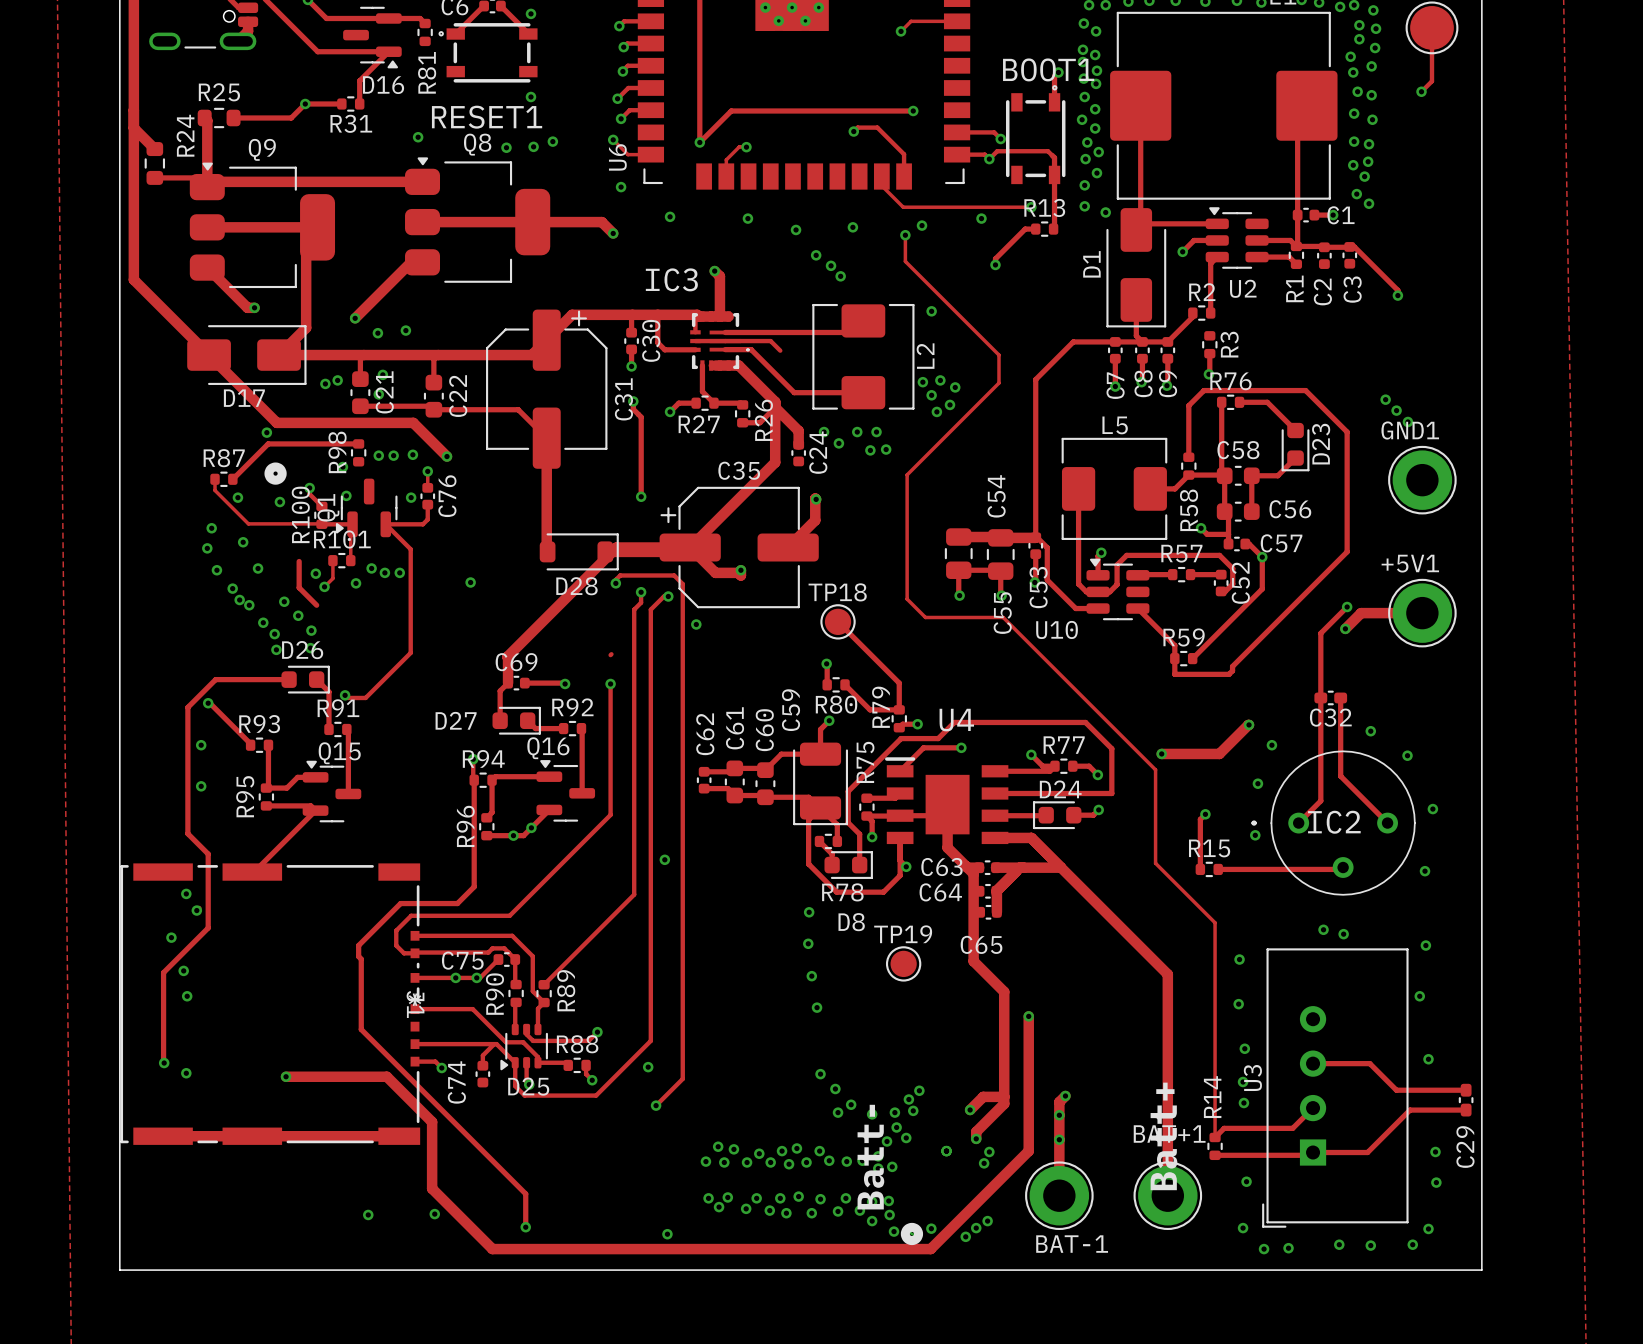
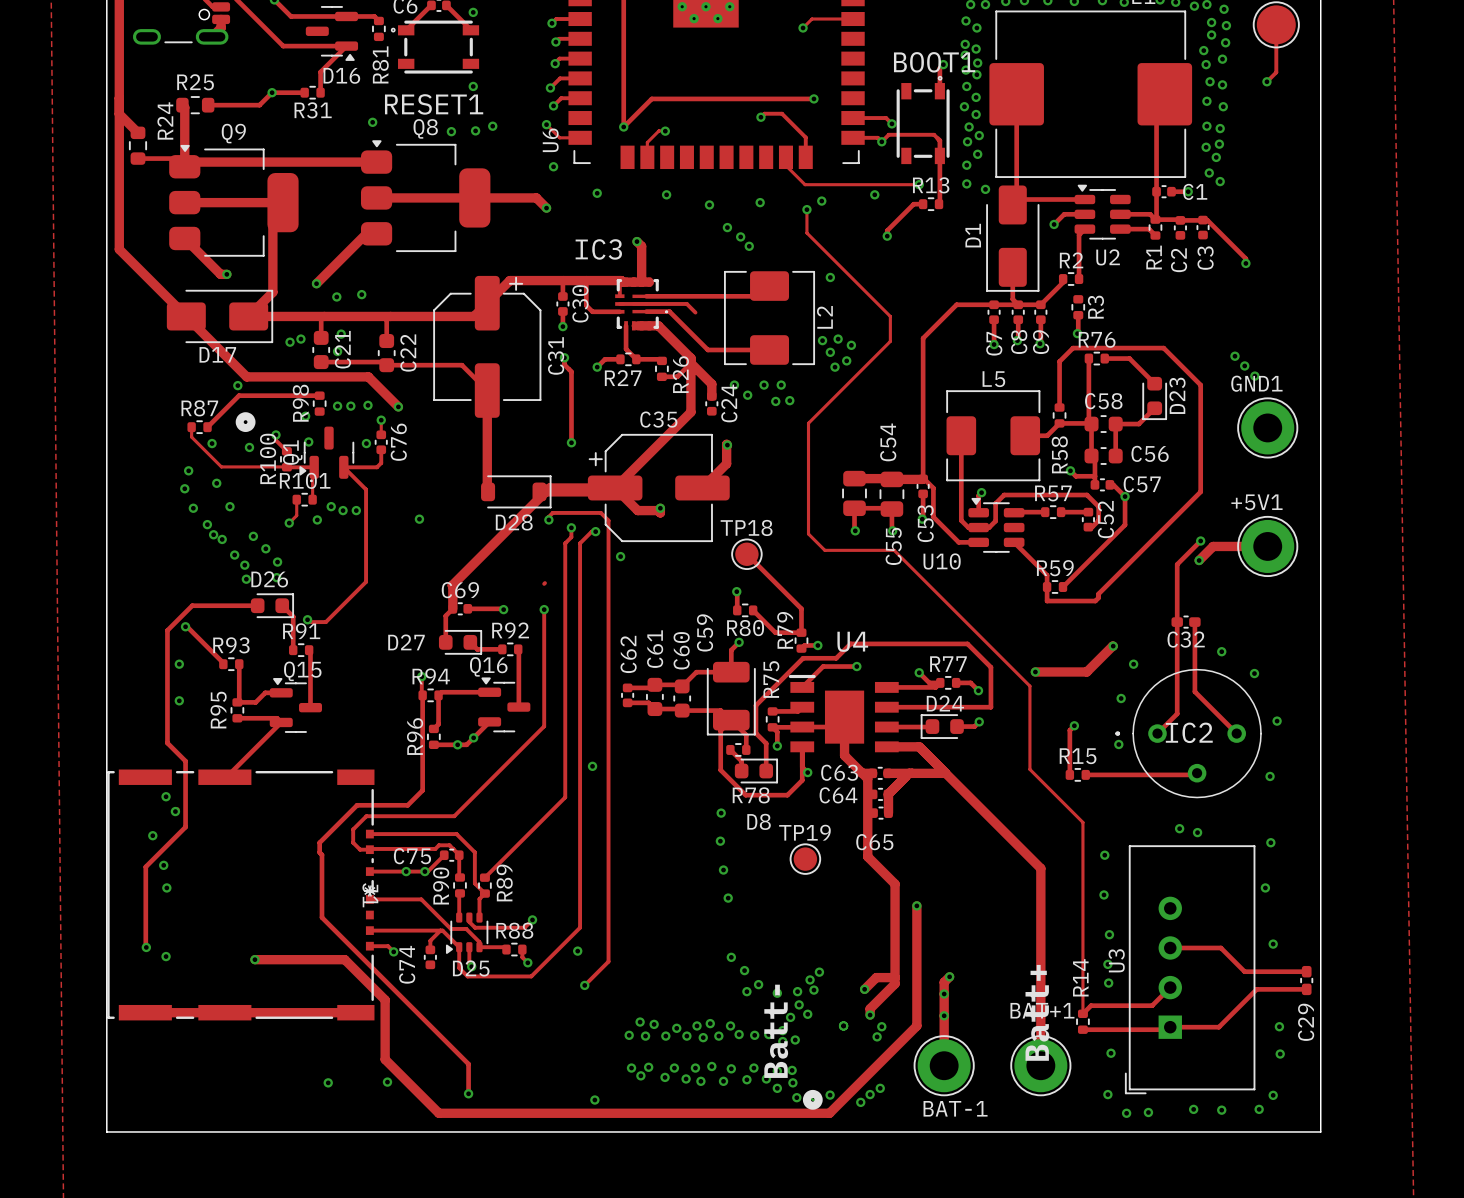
track: (299, 561) (299, 587) (316, 605) -> none
via: (315, 573) -> none

